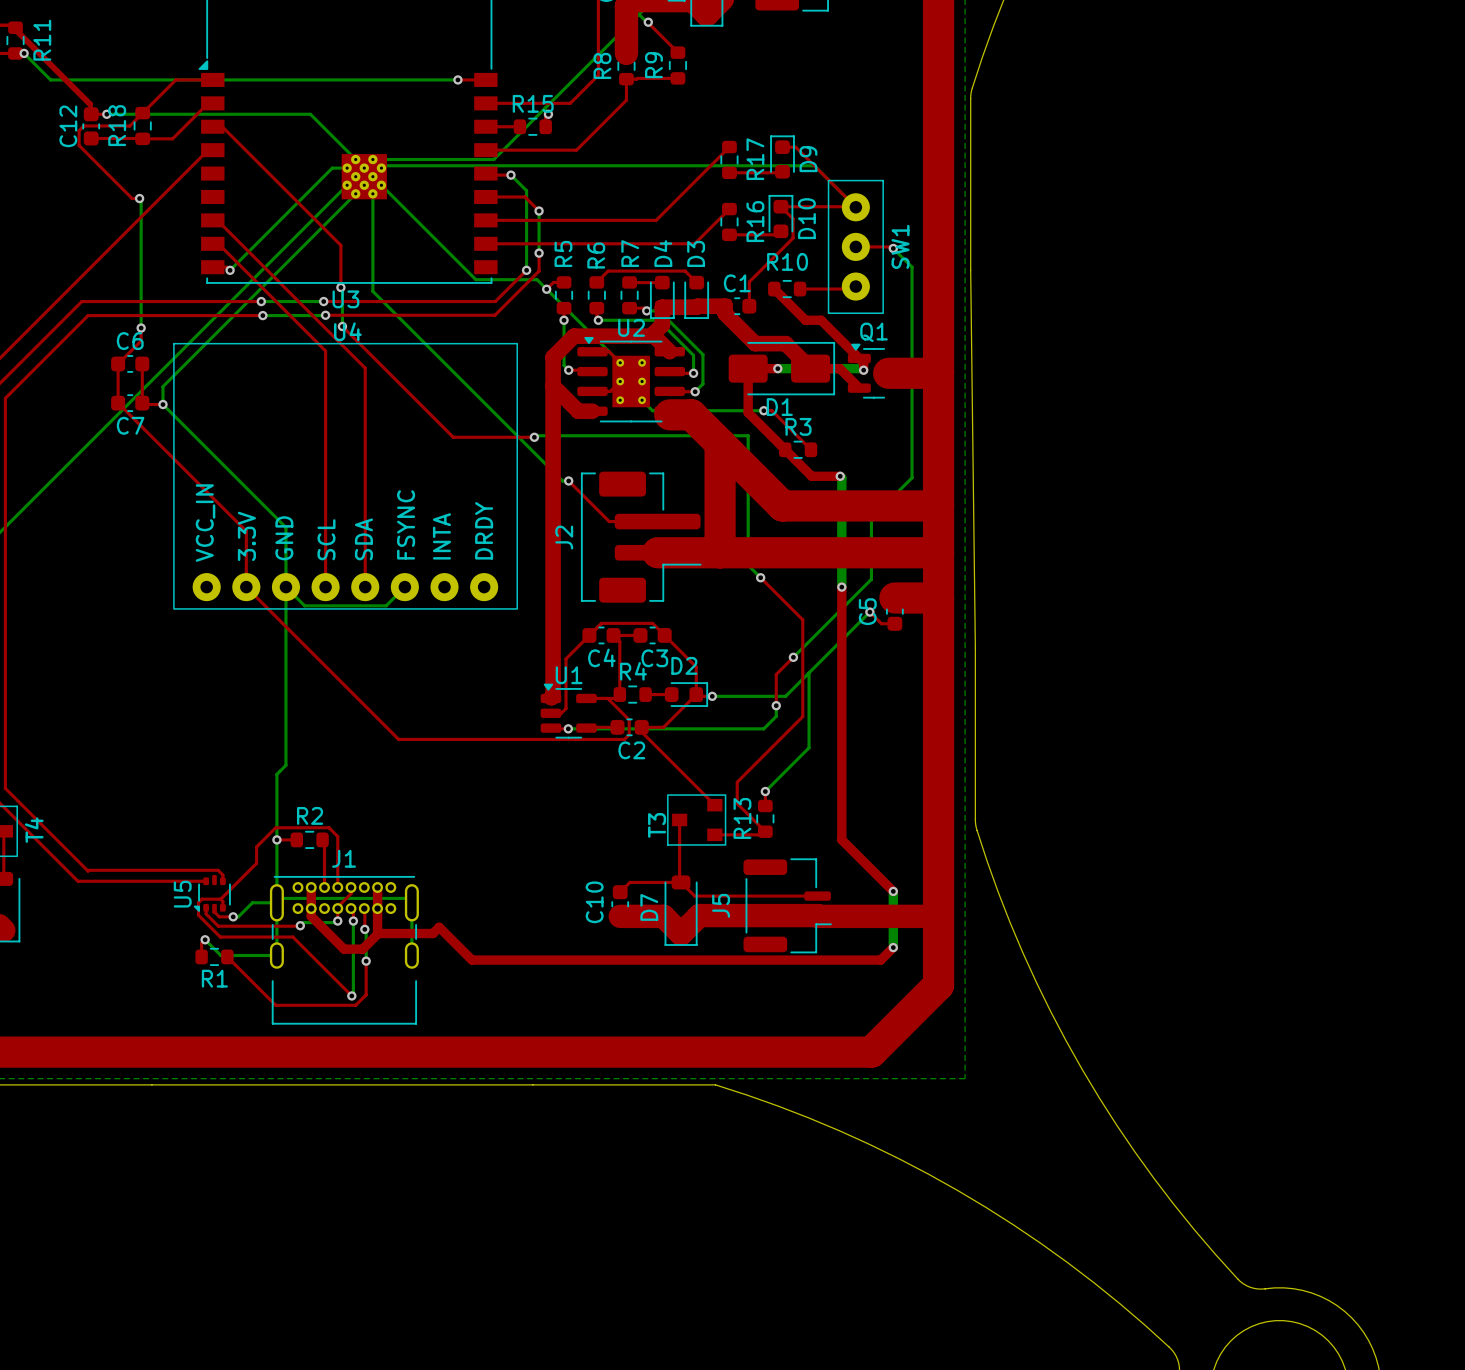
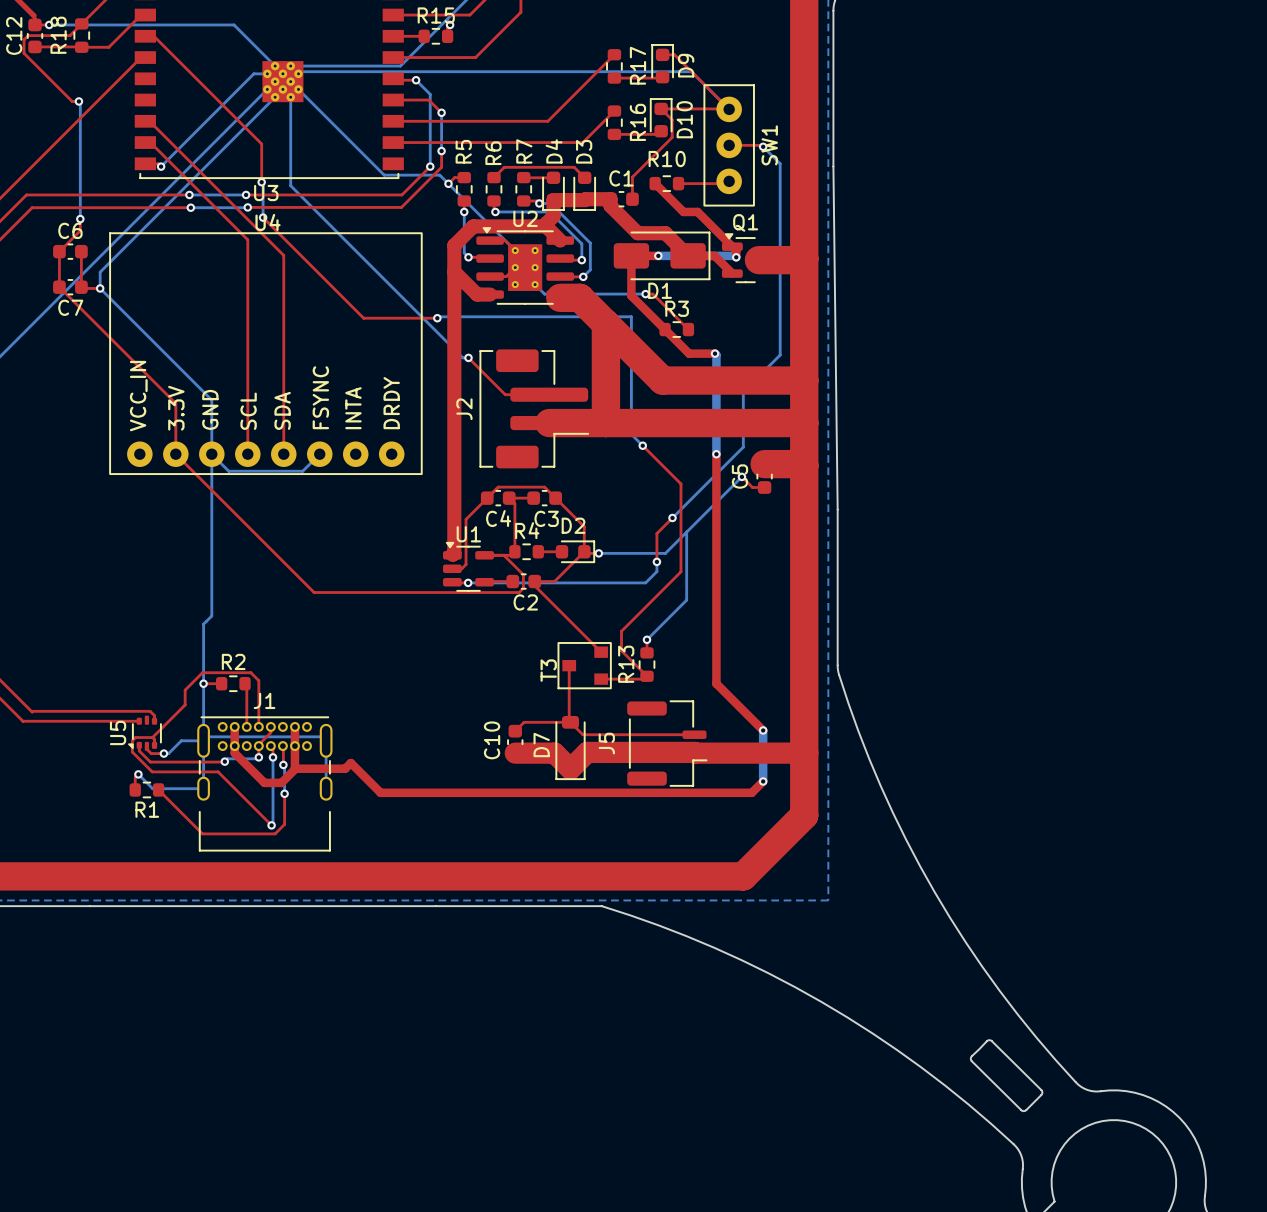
board edge: none -> (991, 1041) (1041, 1090) (1041, 1094) (1025, 1110) (1021, 1110) (971, 1060) (971, 1056) (987, 1041) (991, 1041)

